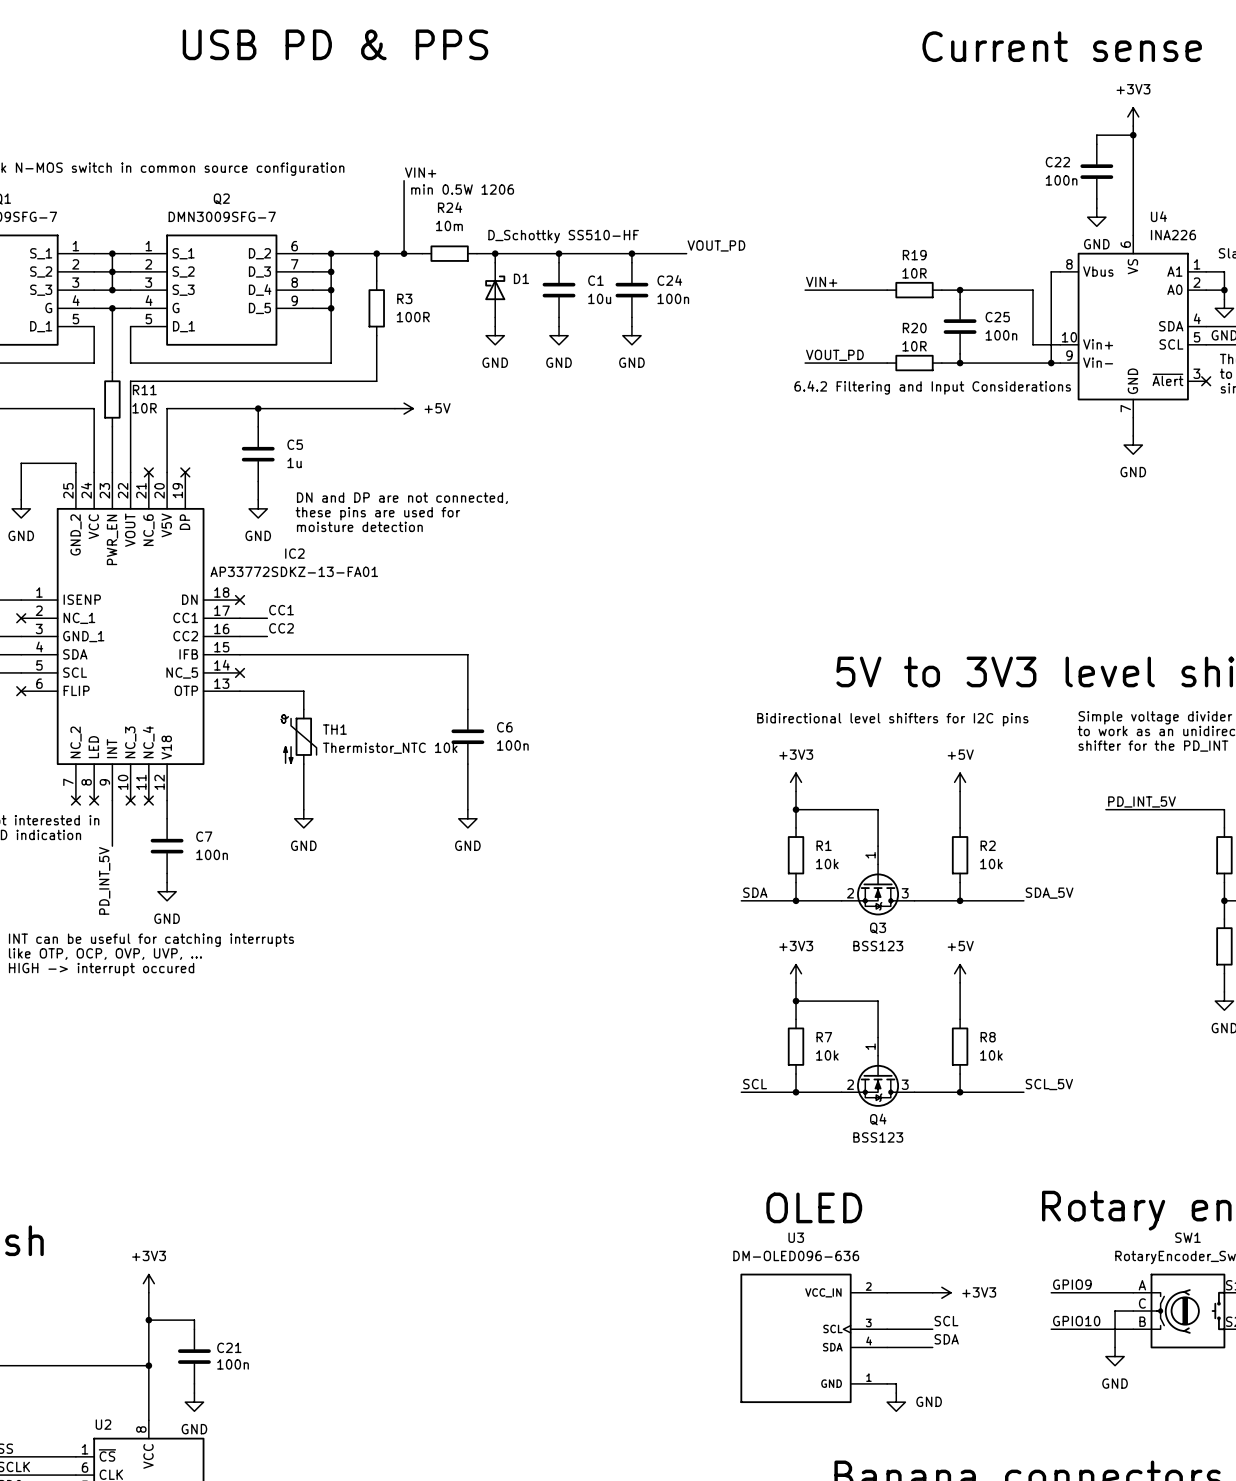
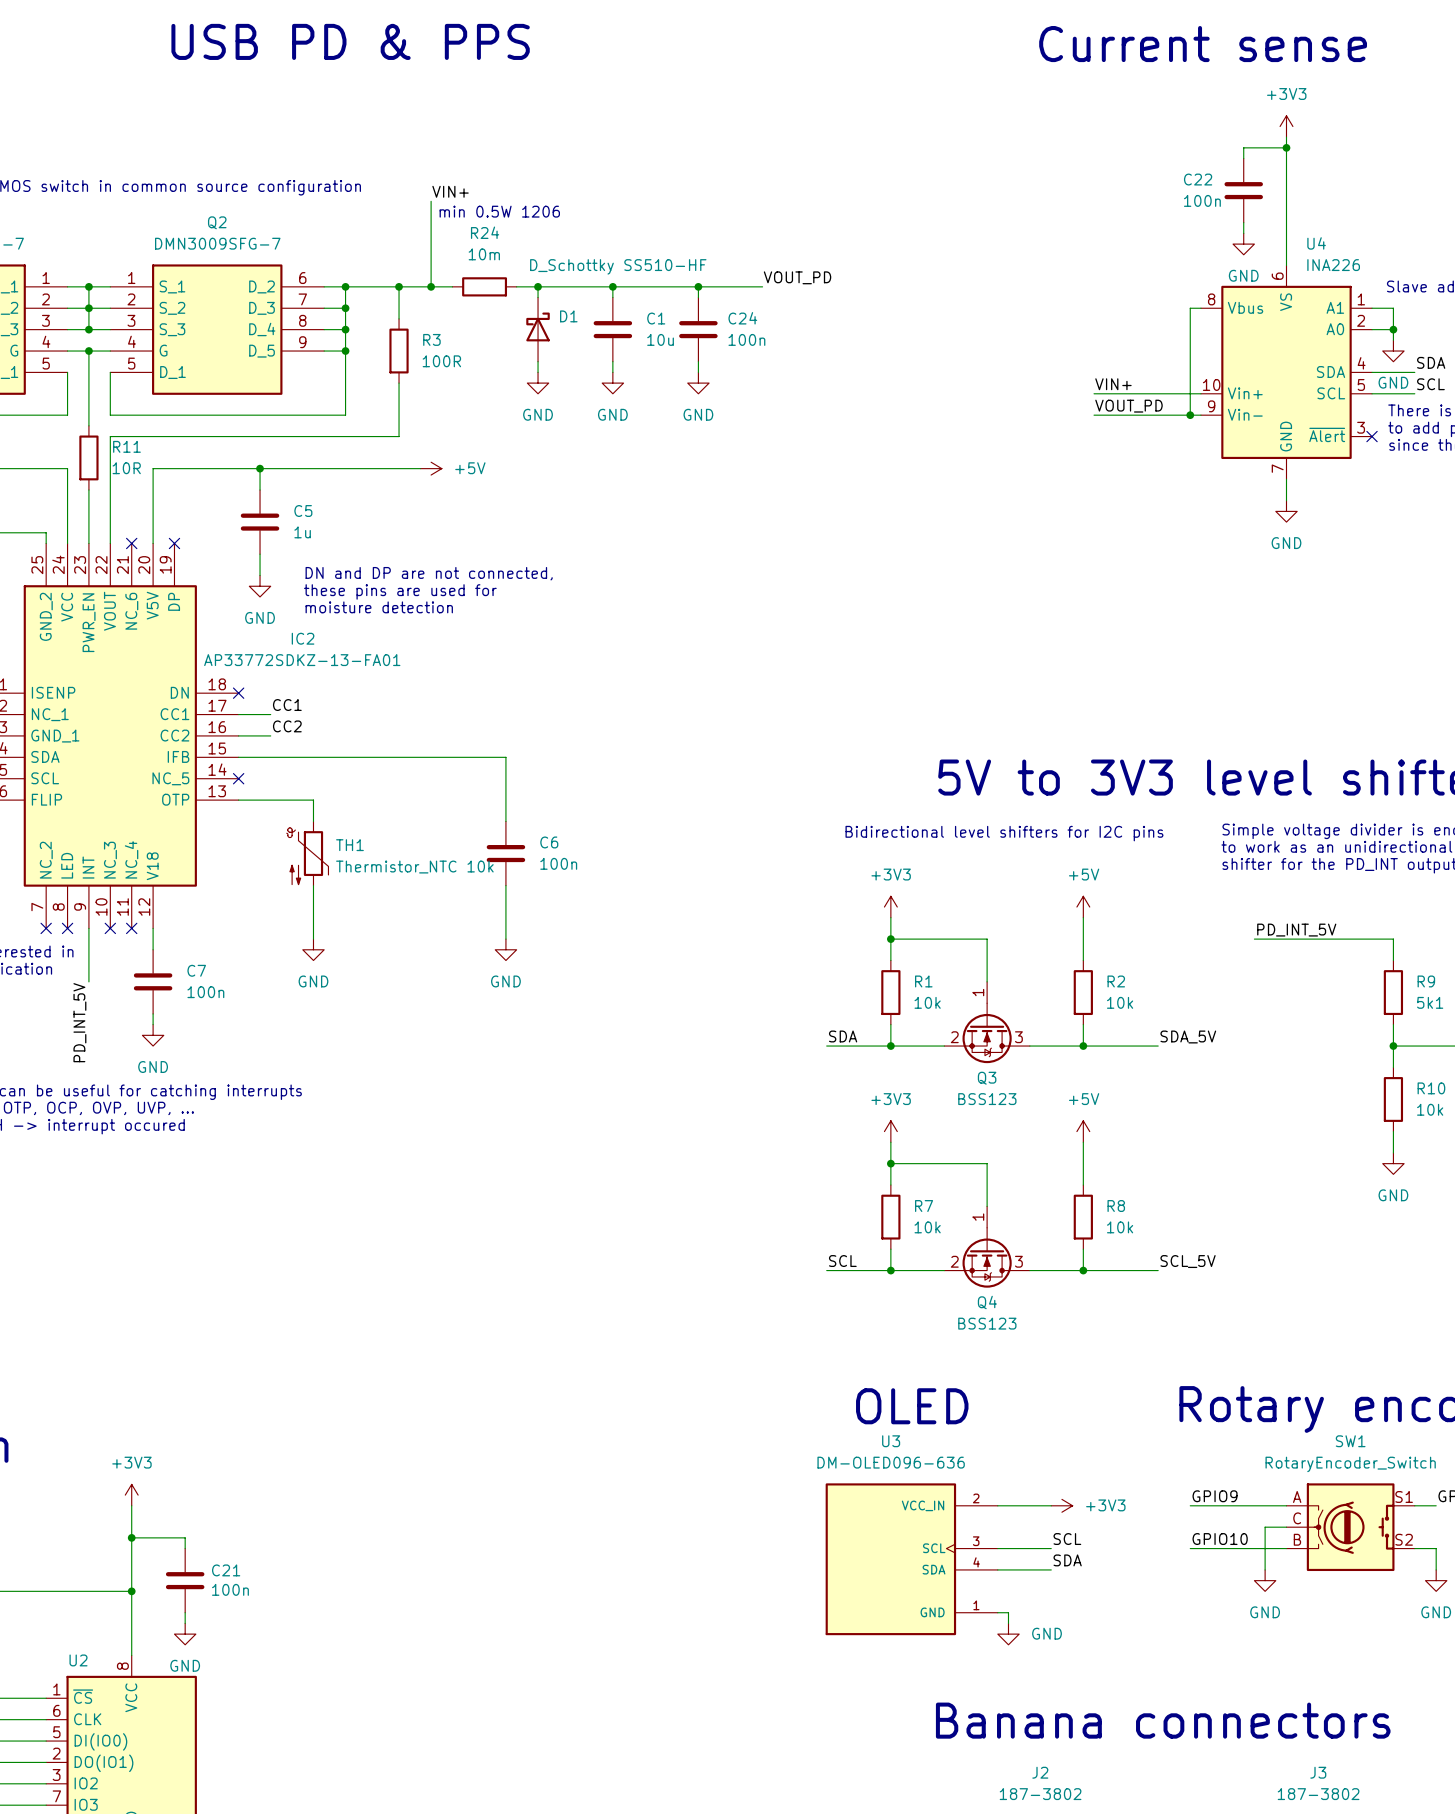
label position: VIN+ (821, 281) -> VIN+ (1113, 384)
wire: (805, 290) (887, 290) -> none
R19: 10R (914, 290) -> none
wire: (941, 290) (1033, 290) (1033, 344) -> (1094, 393) (1168, 393)
wire: (960, 290) (960, 299) -> none
junction: (960, 290) -> none
C25: 100n (960, 326) -> none
wire: (960, 353) (960, 363) -> none
label position: VOUT_PD (834, 355) -> VOUT_PD (1128, 406)
wire: (805, 363) (887, 363) -> none
R20: 10R (914, 363) -> none
wire: (941, 363) (969, 363) -> none
junction: (960, 363) -> none
text: 6.4.2 Filtering and Input Considerations (932, 387) -> none

